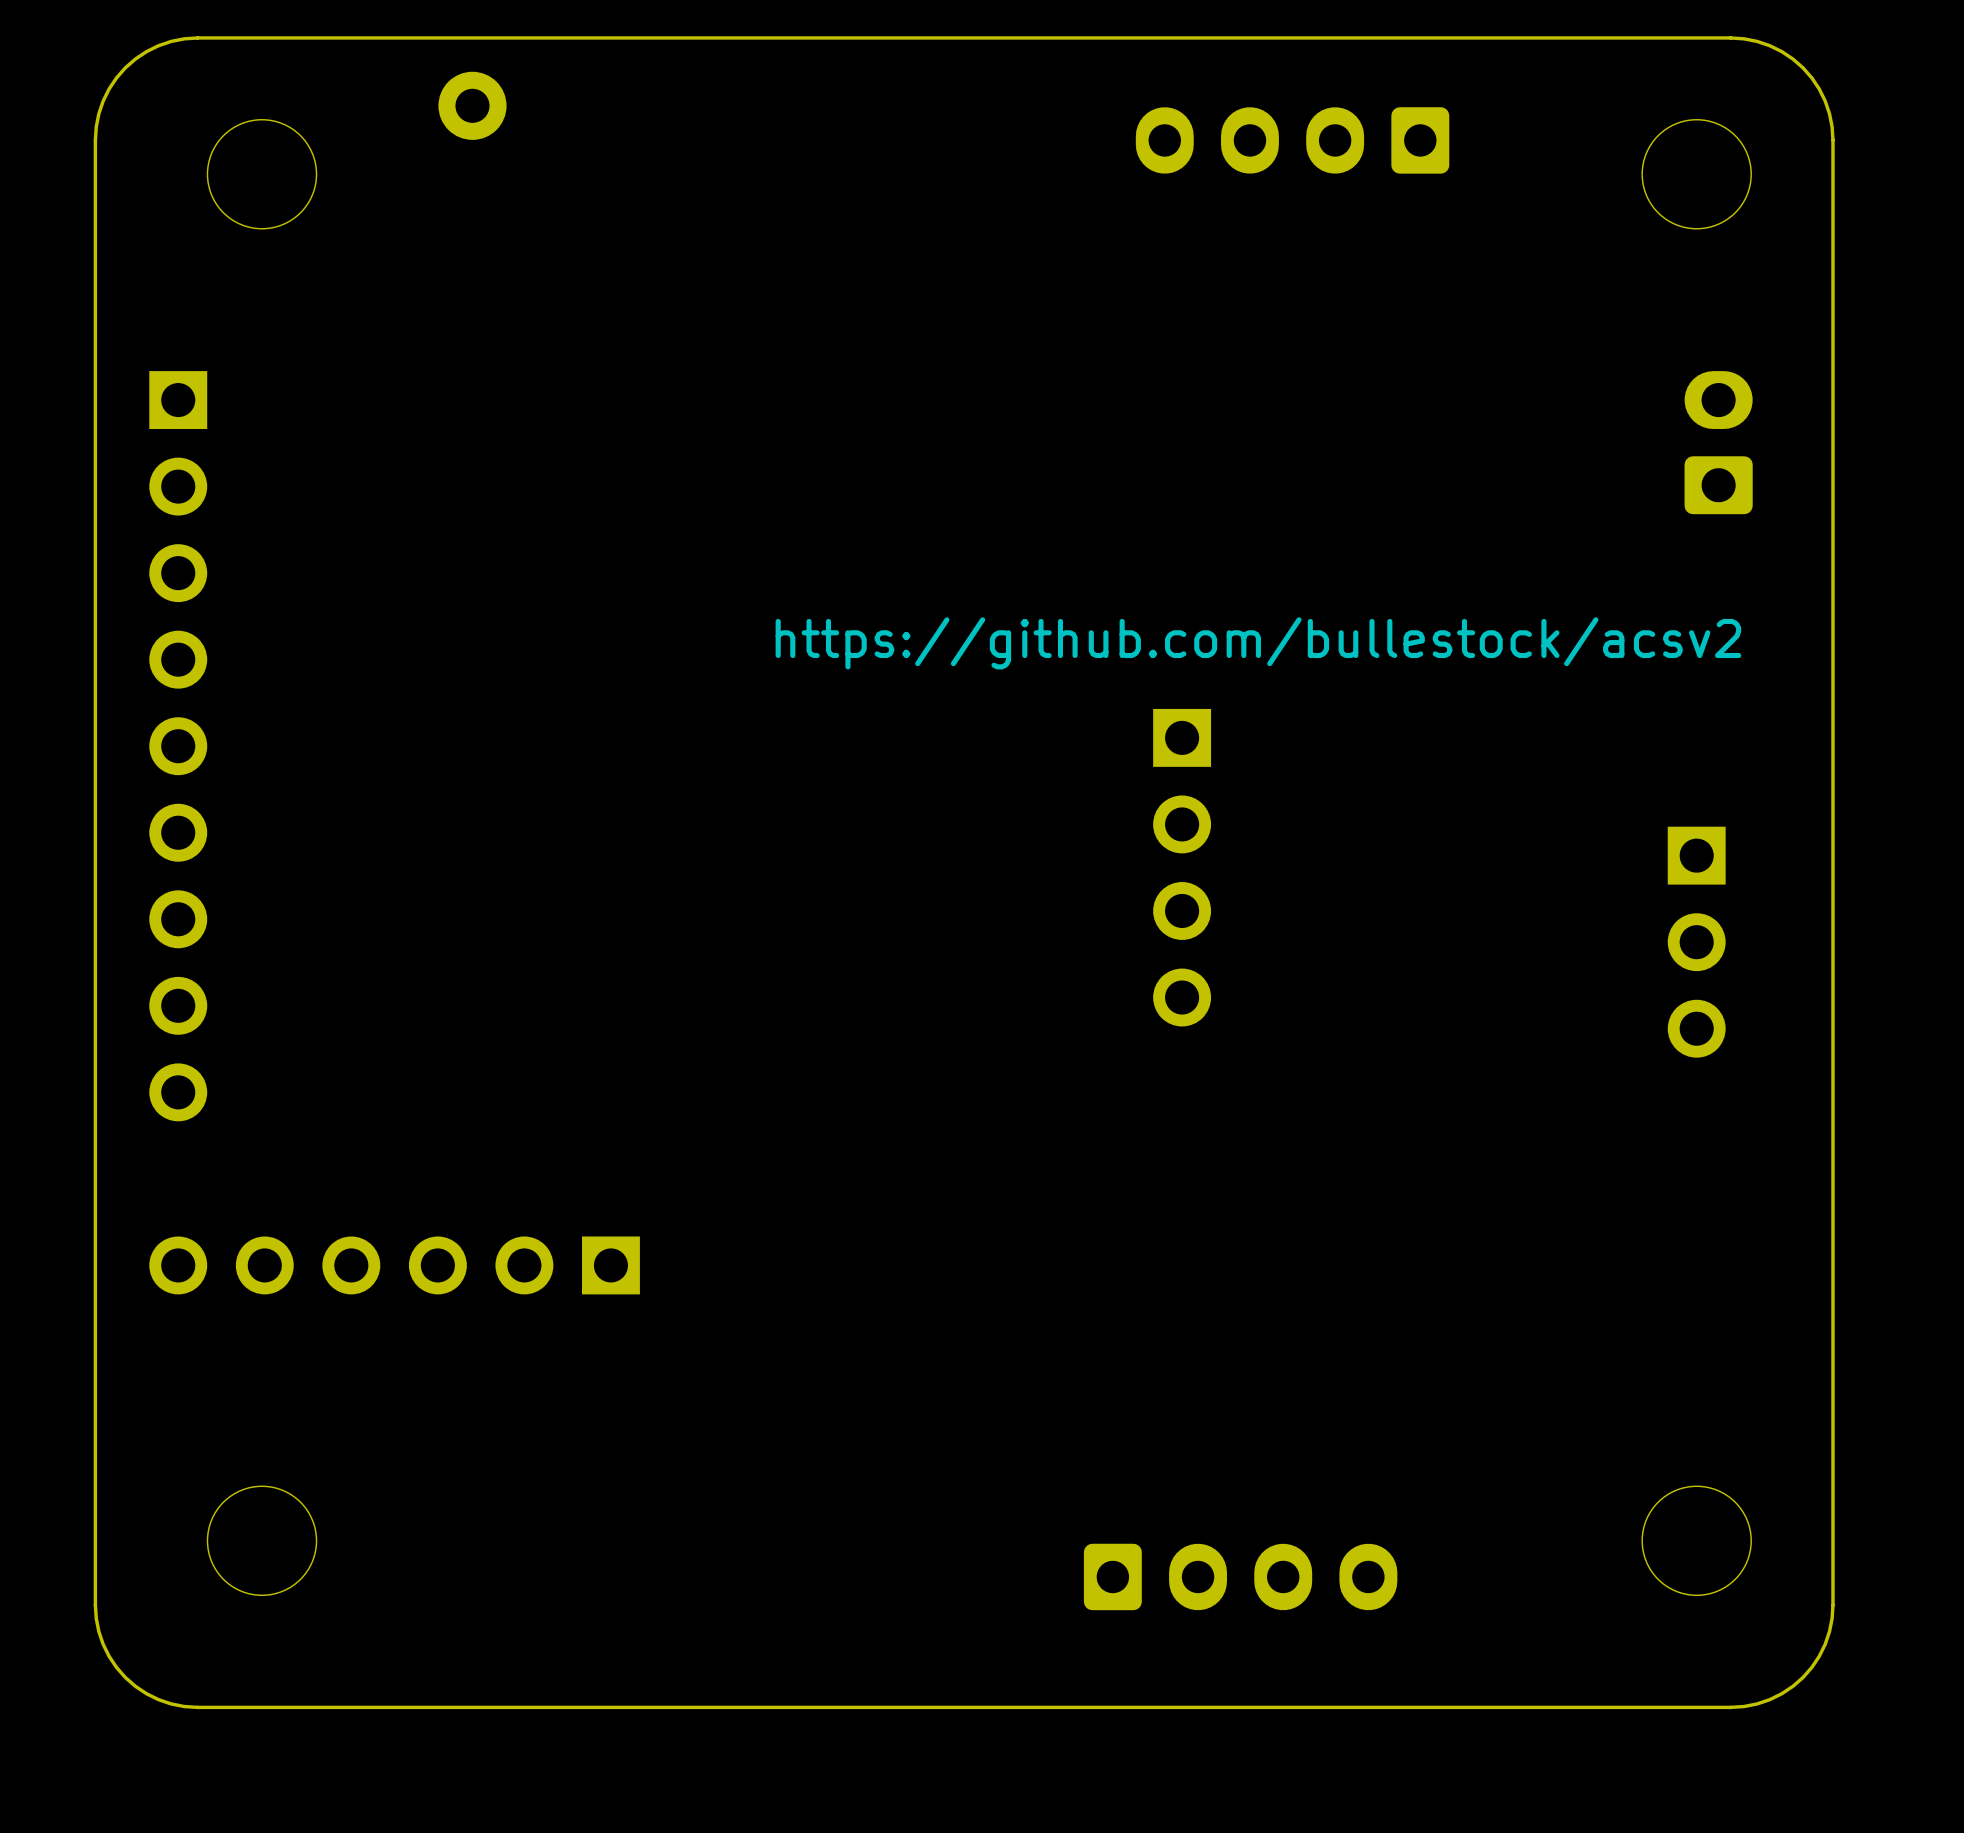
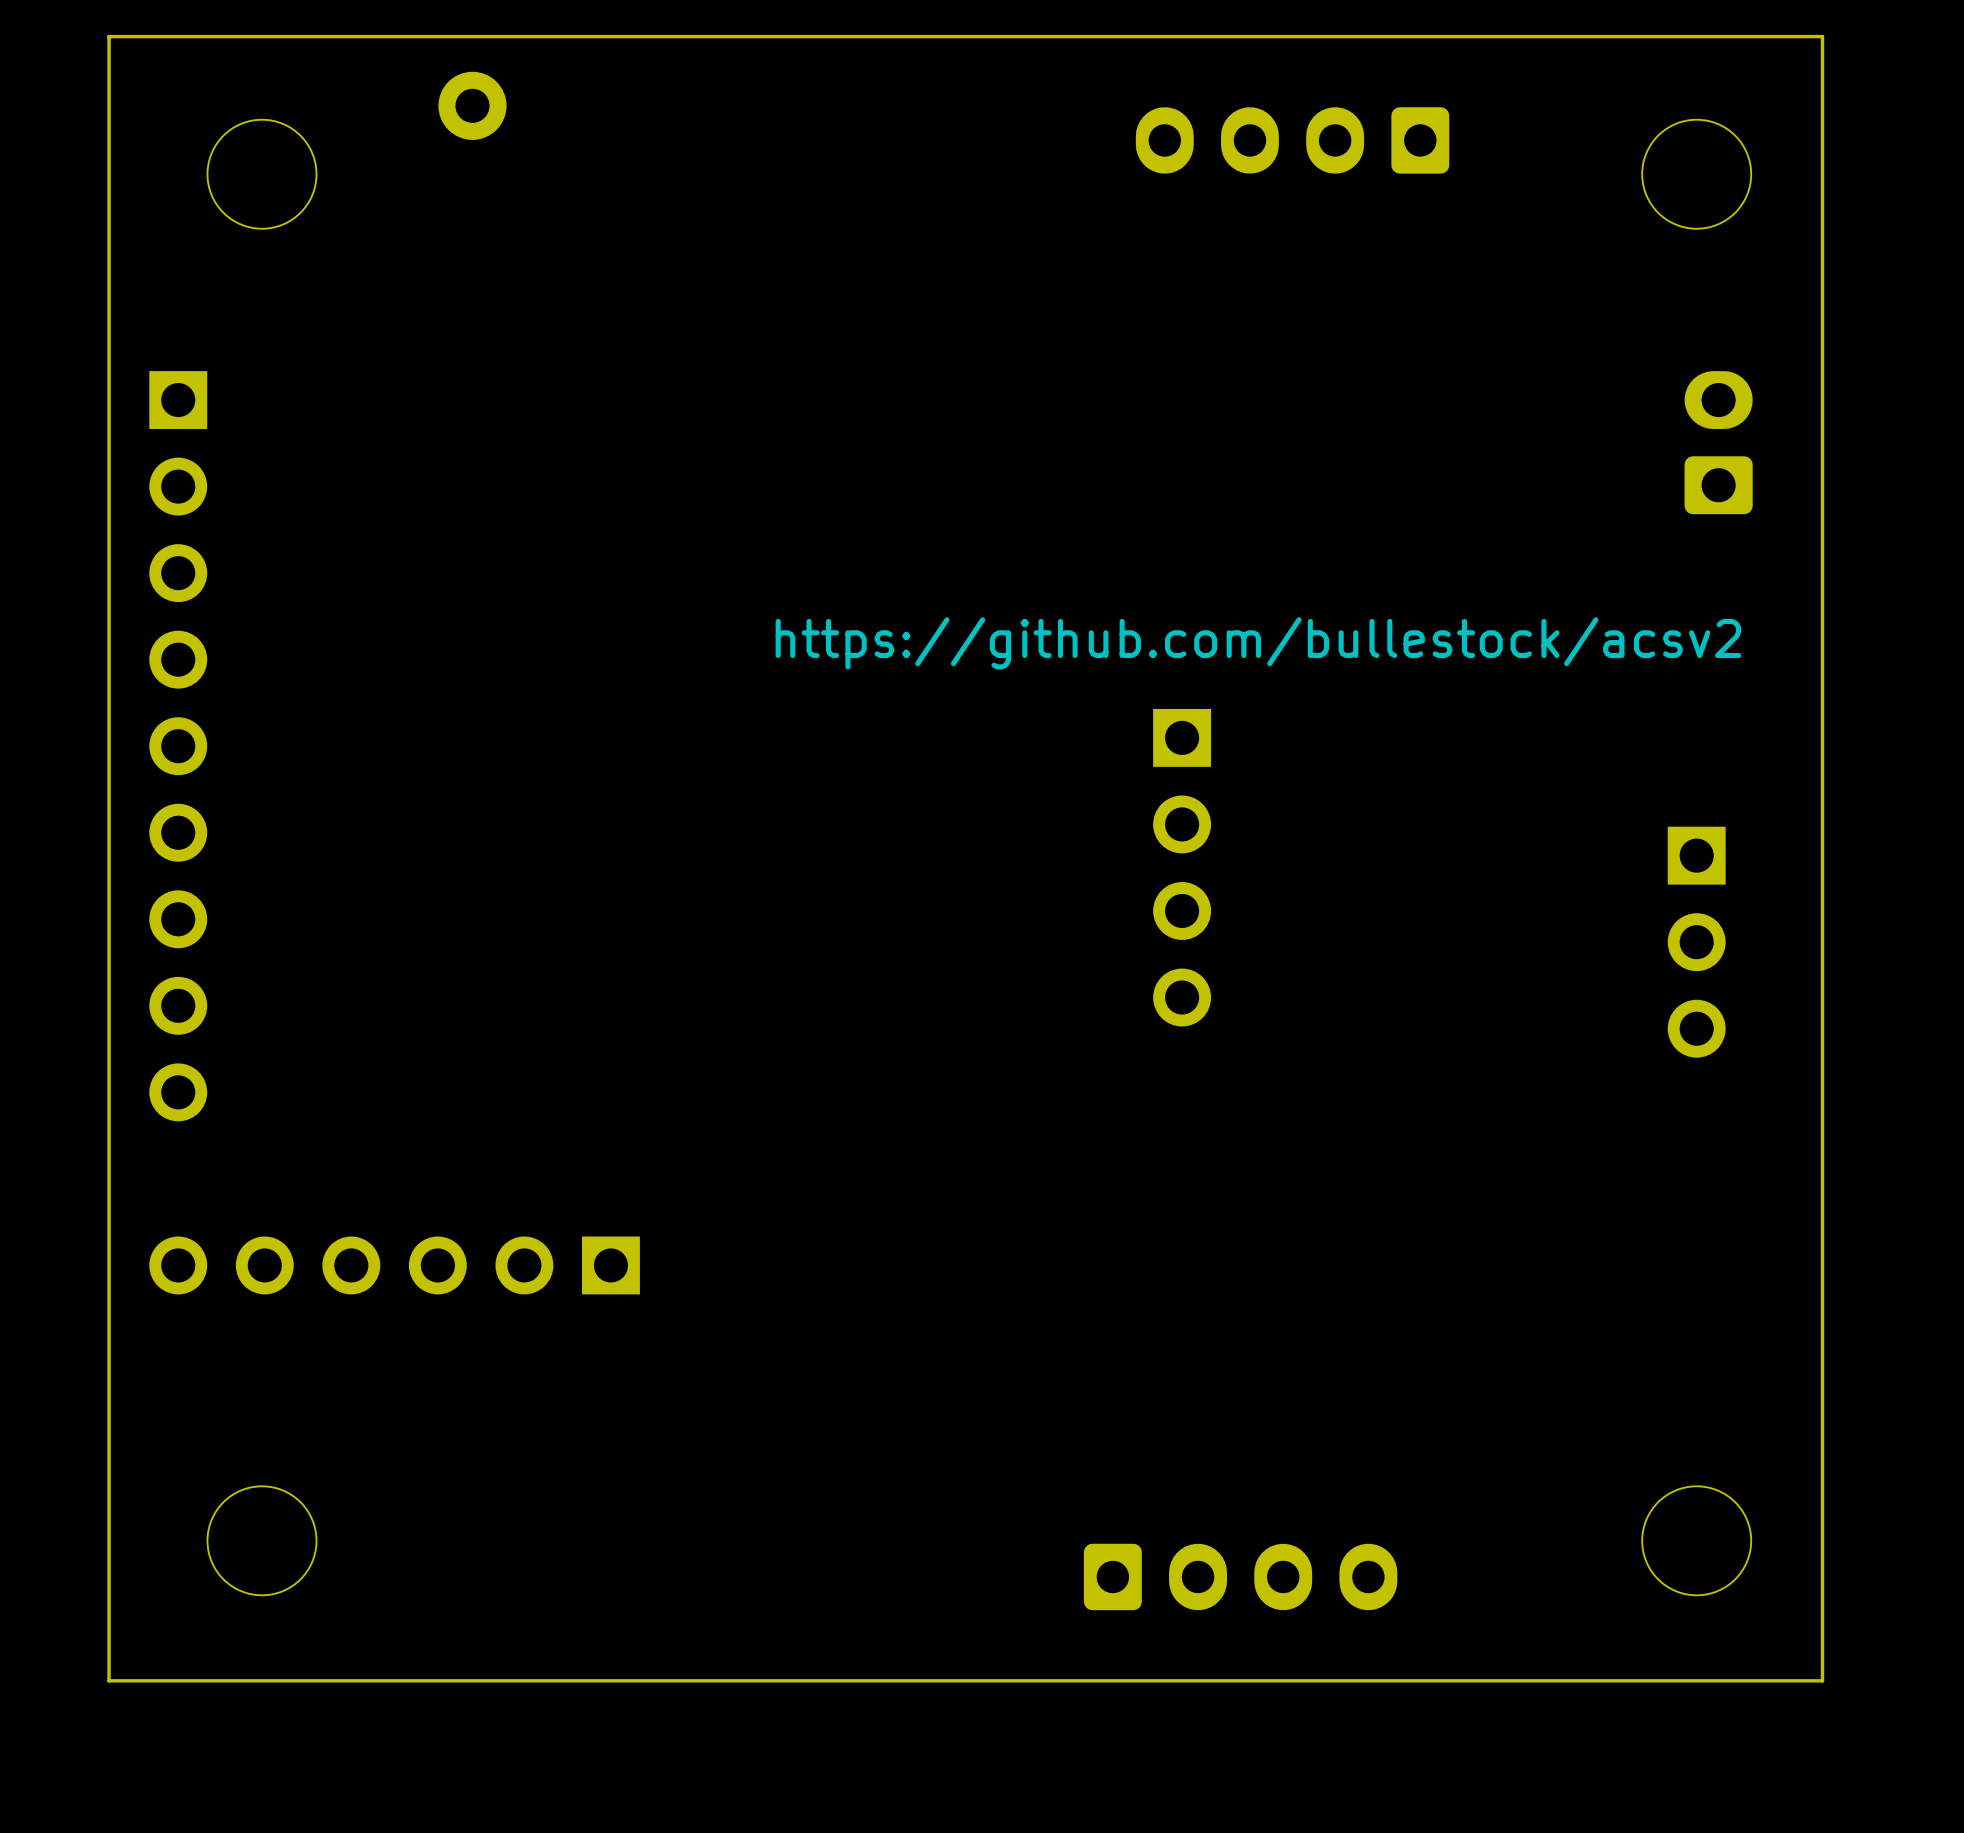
board edge: (1730, 37) (197, 37) (184, 38) (158, 45) (135, 59) (125, 67) (116, 77) (103, 101) (98, 113) (95, 140) (95, 1605) (96, 1618) (103, 1644) (116, 1667) (125, 1677) (135, 1686) (158, 1699) (184, 1706) (197, 1707) (1730, 1707) (1757, 1703) (1769, 1699) (1781, 1693) (1803, 1677) (1811, 1667) (1825, 1644) (1829, 1631) (1832, 1605) (1832, 140) (1829, 113) (1825, 101) (1819, 89) (1803, 67) (1792, 59) (1769, 45) (1757, 41) (1730, 37) -> (1822, 36) (1822, 1680) (109, 1680) (109, 36) (1822, 36)

